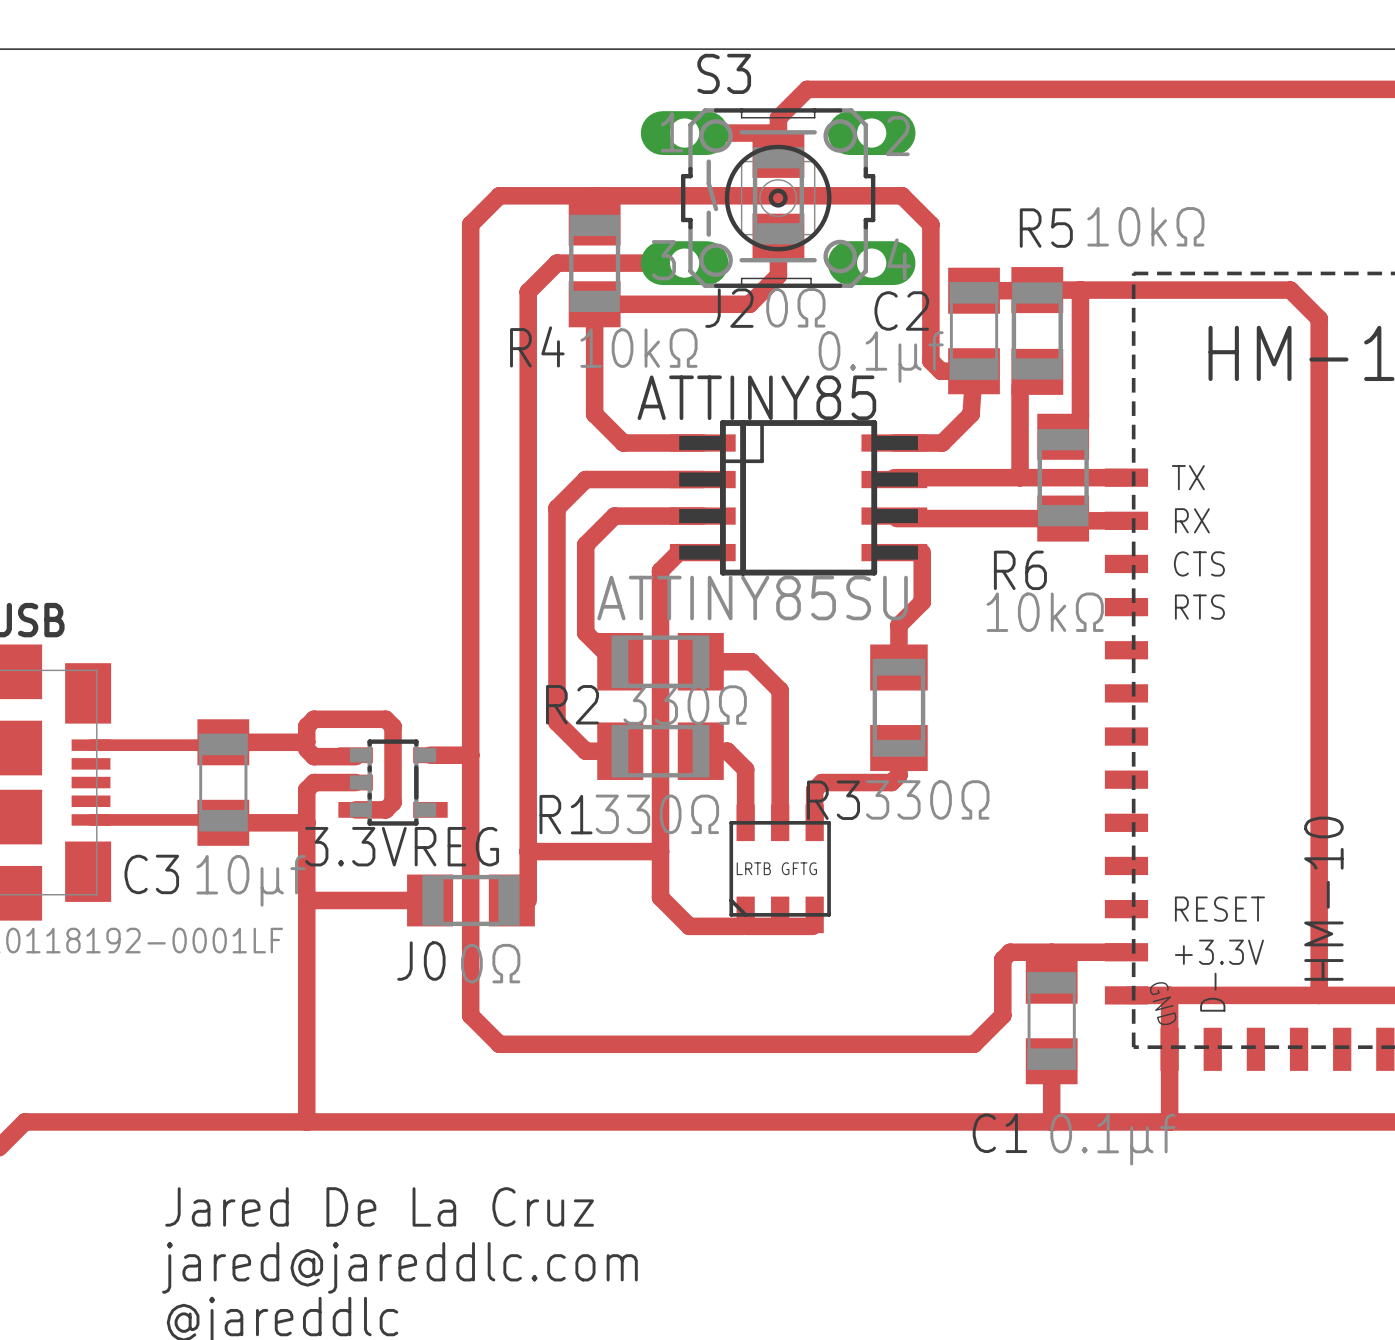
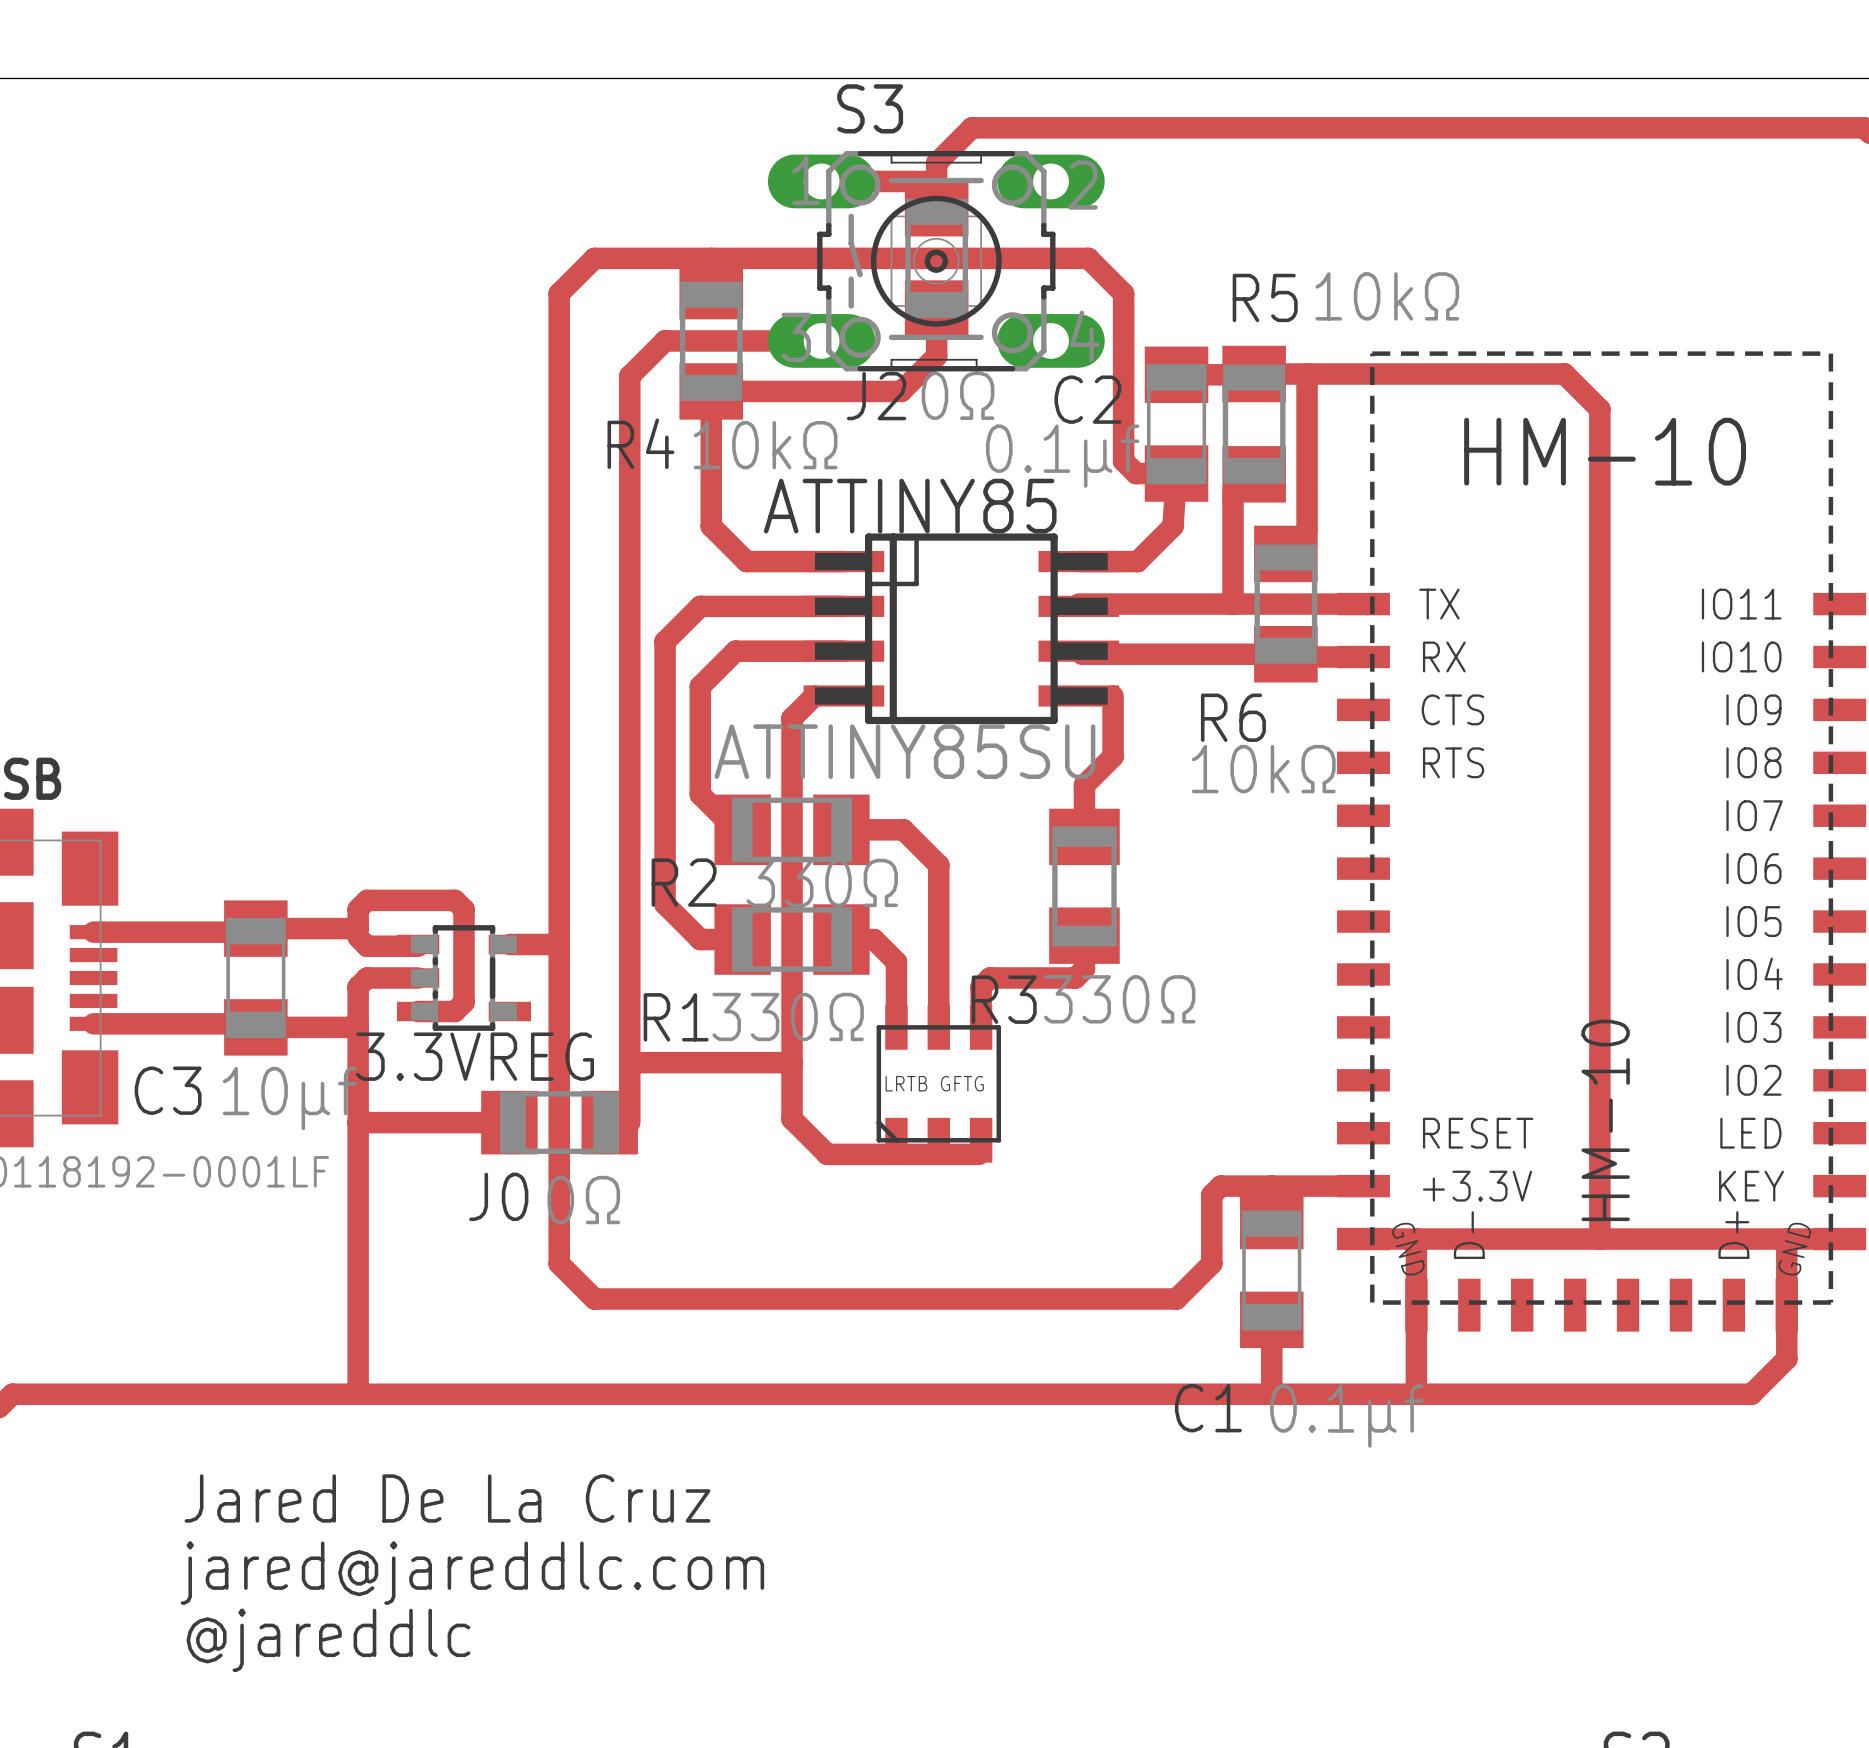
track width: thin (91, 745) (220, 745) -> thick (93, 932) (252, 932)
track width: thin (91, 819) (220, 819) -> thick (93, 1023) (252, 1023)

